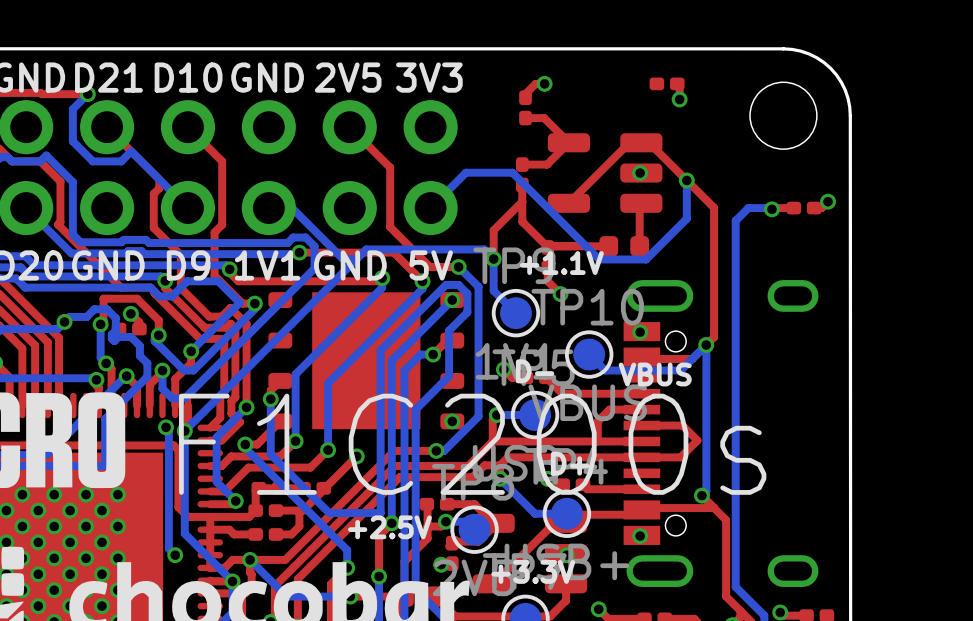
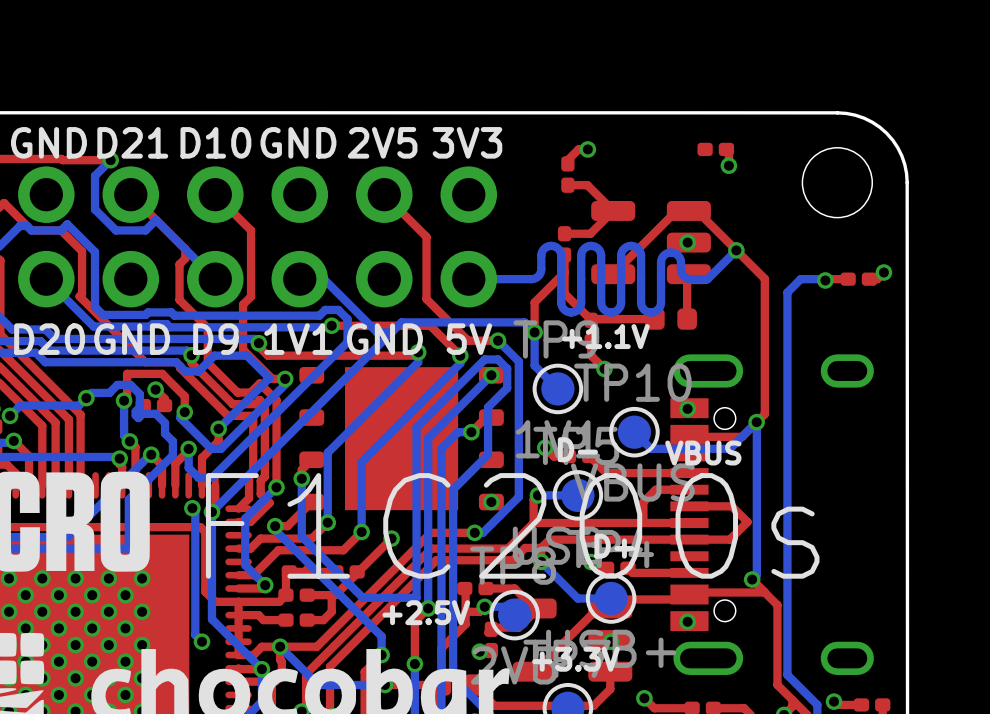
bottom track: (686, 180) (686, 218) (646, 259) (599, 259) (512, 172) (465, 172) (430, 208) -> (736, 250) (707, 279) (685, 277) (681, 273) (680, 259) (678, 255) (671, 252) (664, 254) (661, 261) (660, 305) (657, 310) (652, 312) (646, 311) (641, 305) (640, 254) (638, 248) (632, 245) (626, 247) (621, 253) (621, 303) (619, 308) (613, 312) (606, 311) (601, 305) (601, 254) (599, 249) (593, 246) (586, 247) (581, 253) (581, 303) (579, 308) (573, 312) (566, 311) (561, 305) (561, 254) (559, 249) (553, 246) (547, 246) (542, 250) (540, 271) (535, 278) (468, 279)

